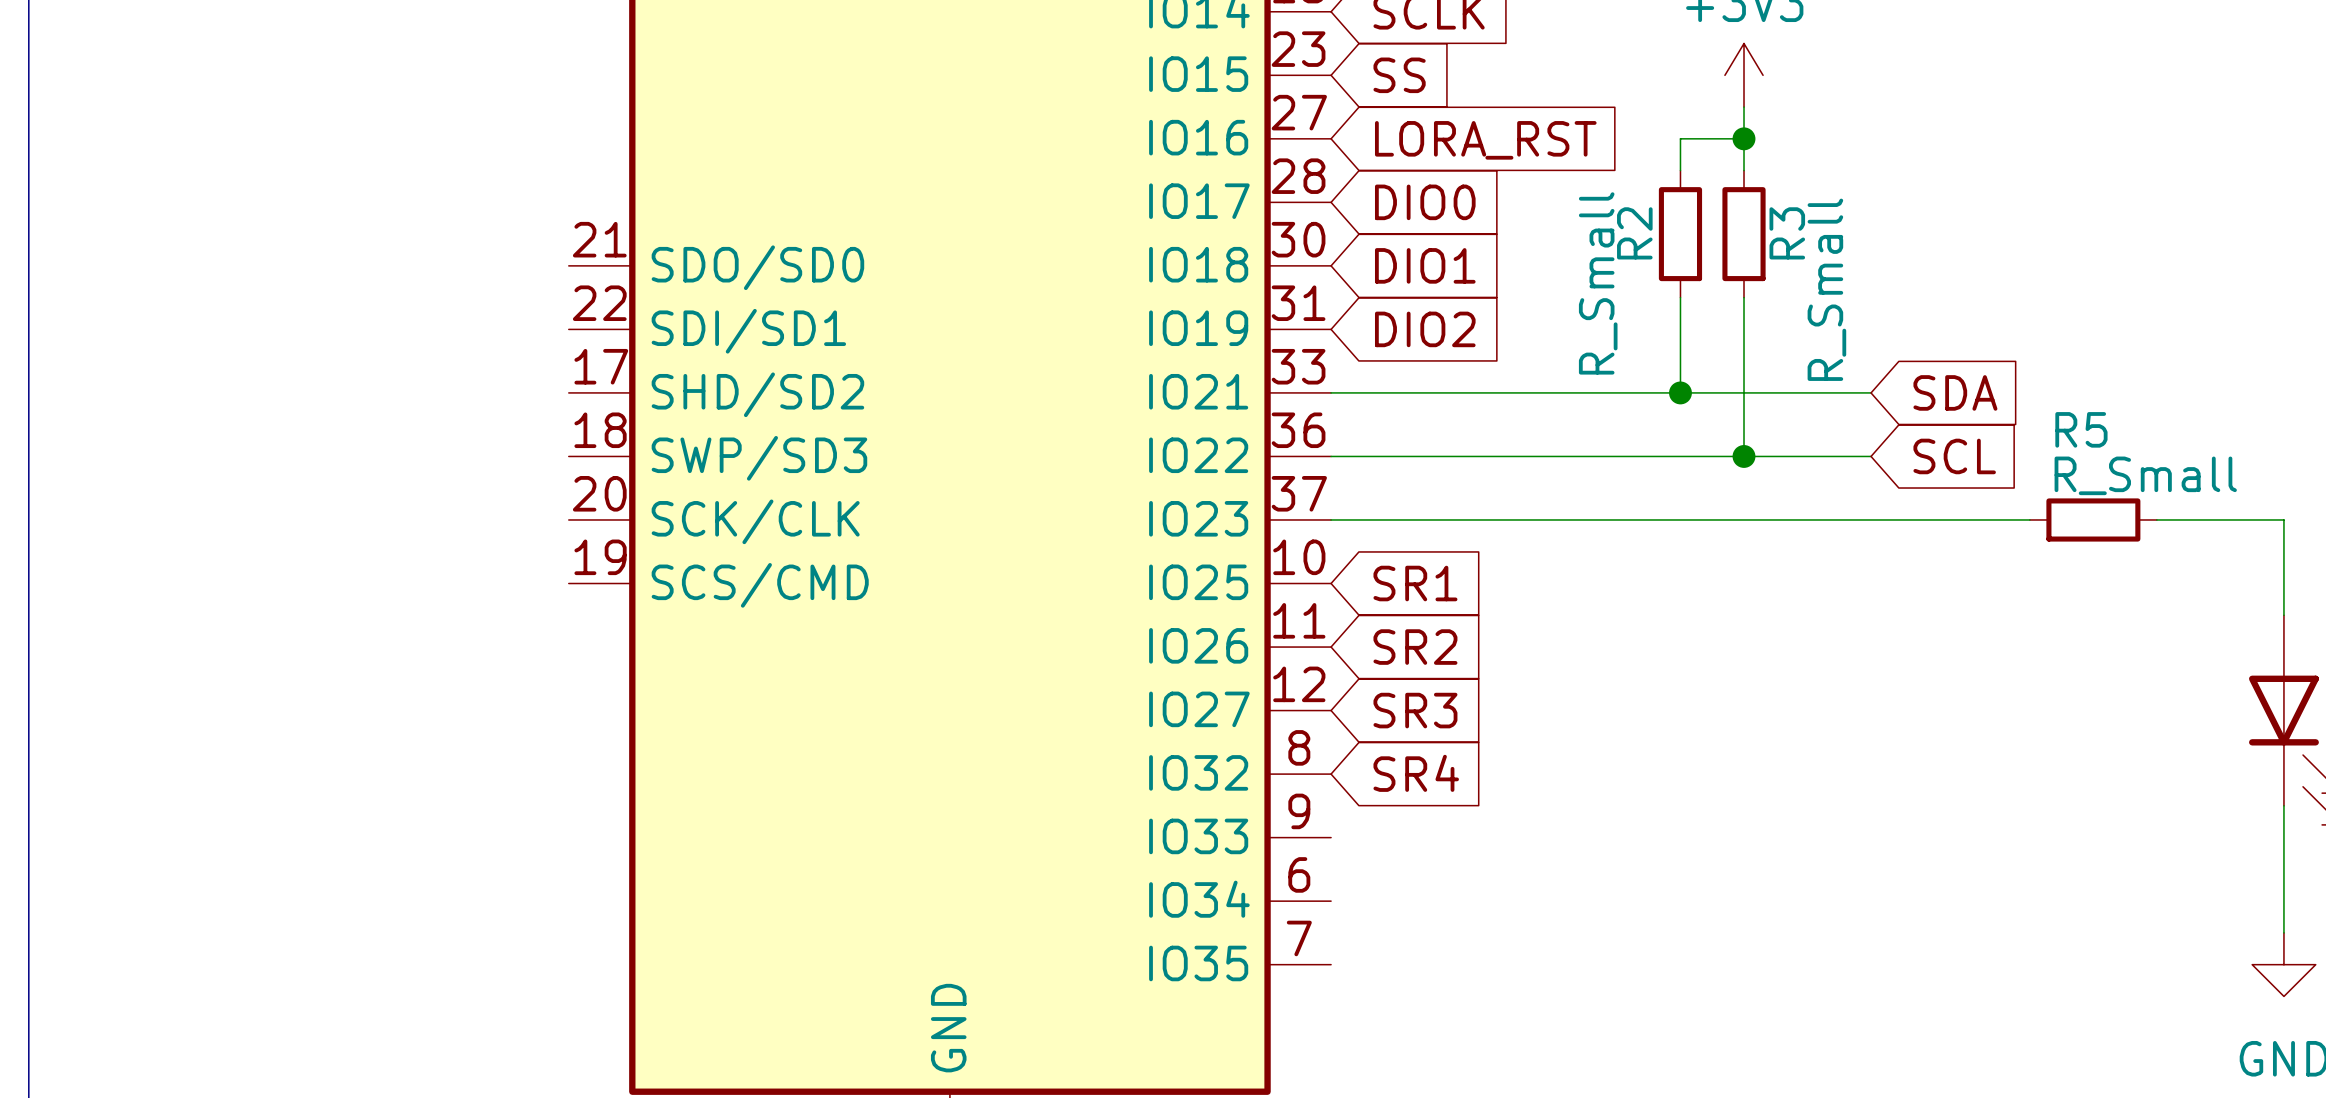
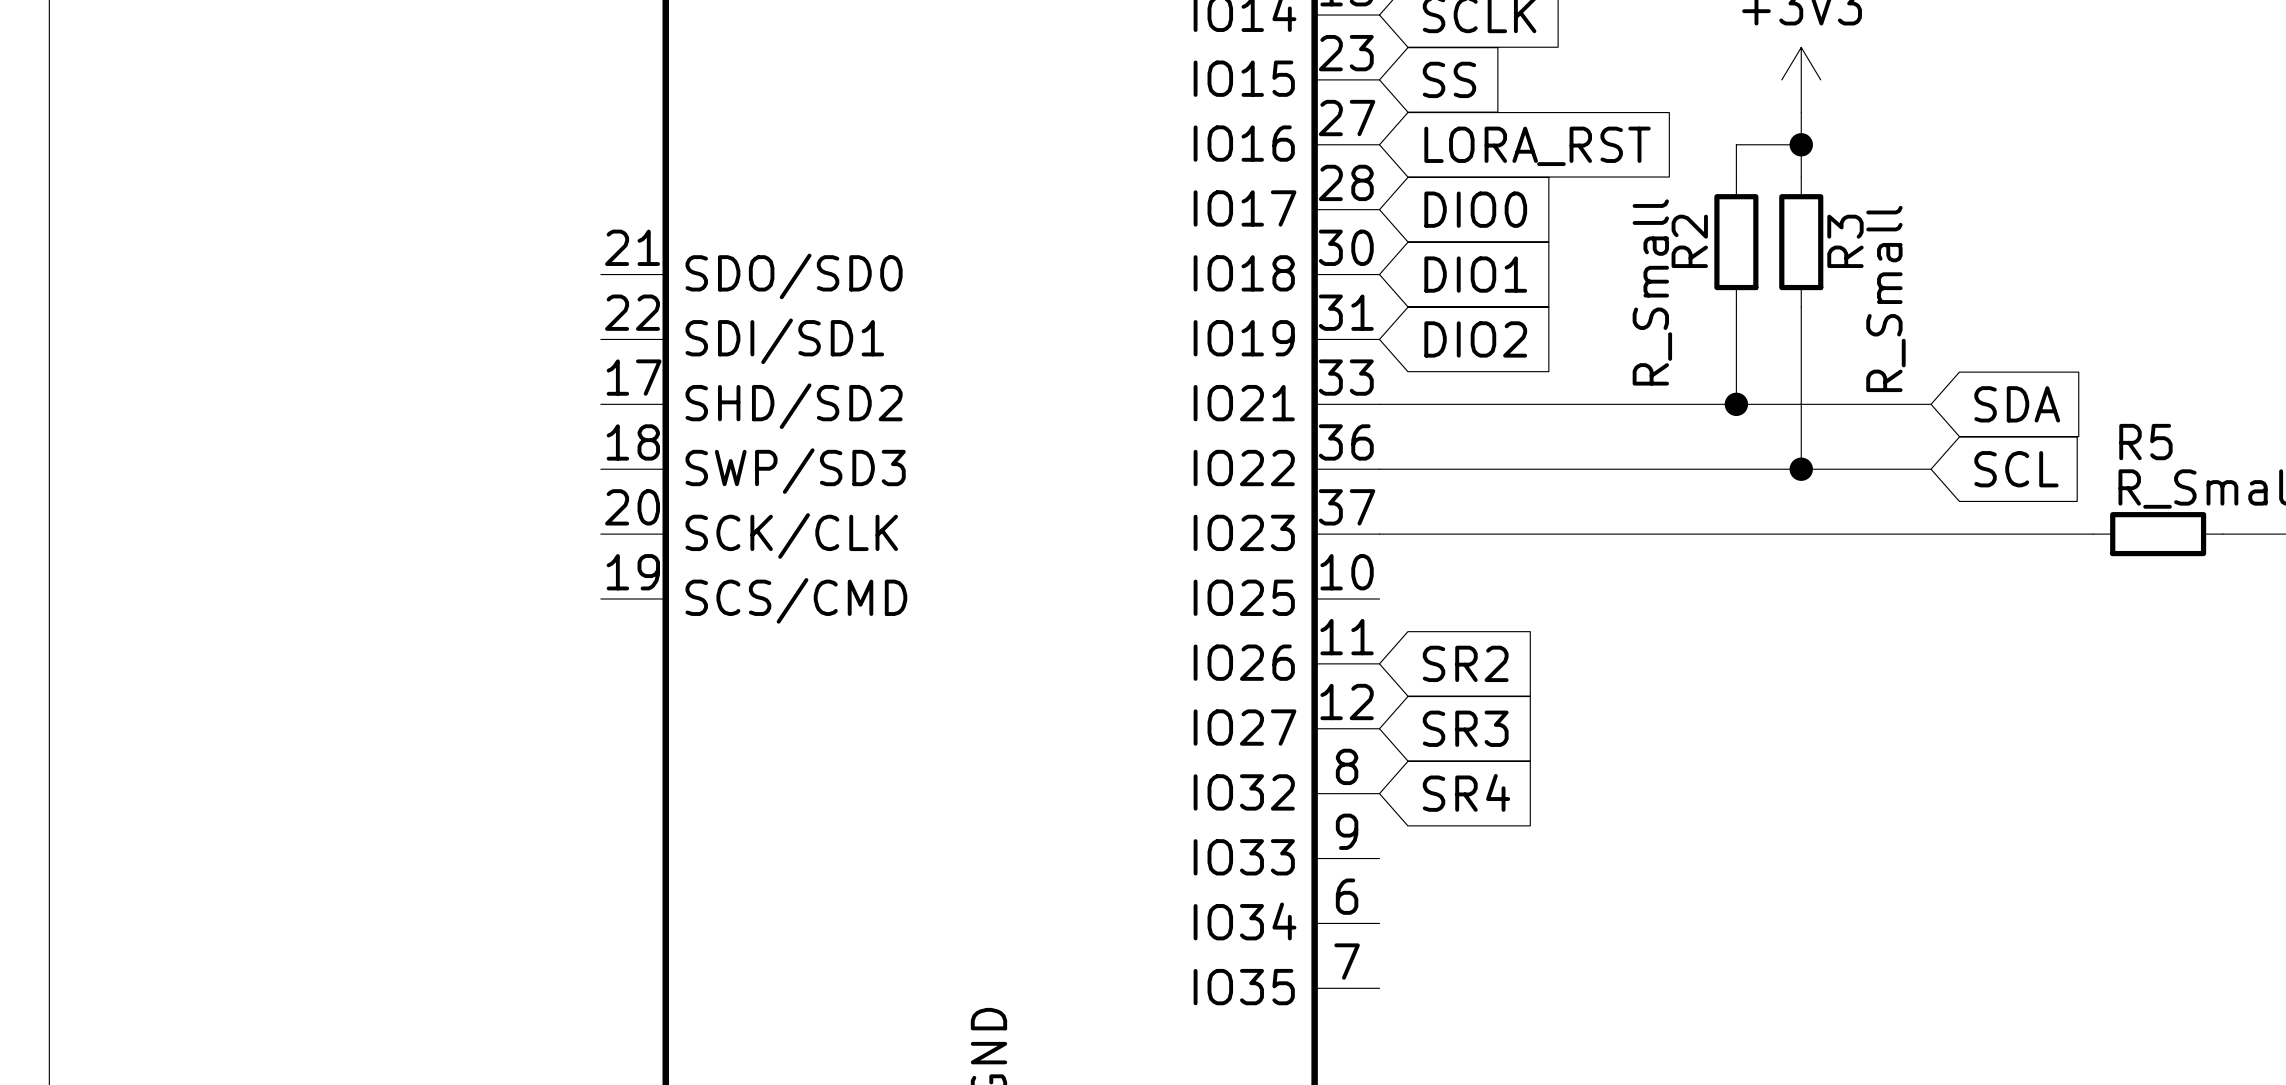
global label: SR1 (1415, 583) -> none

